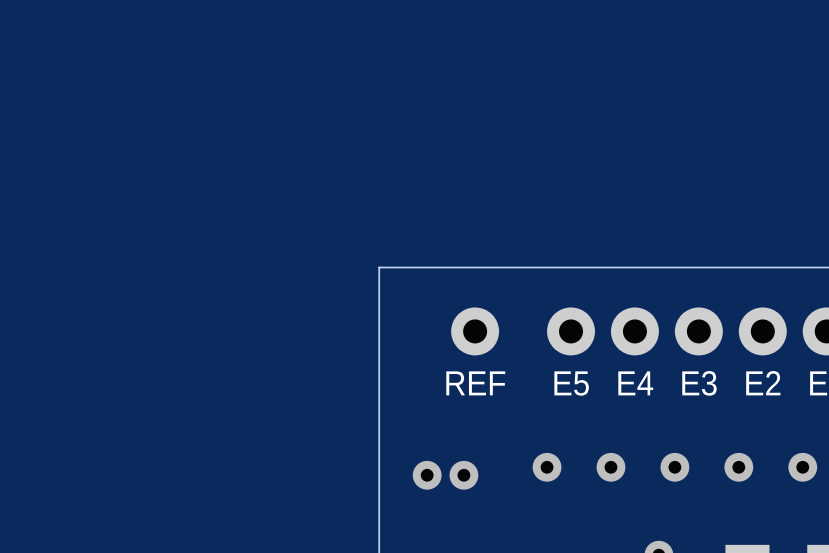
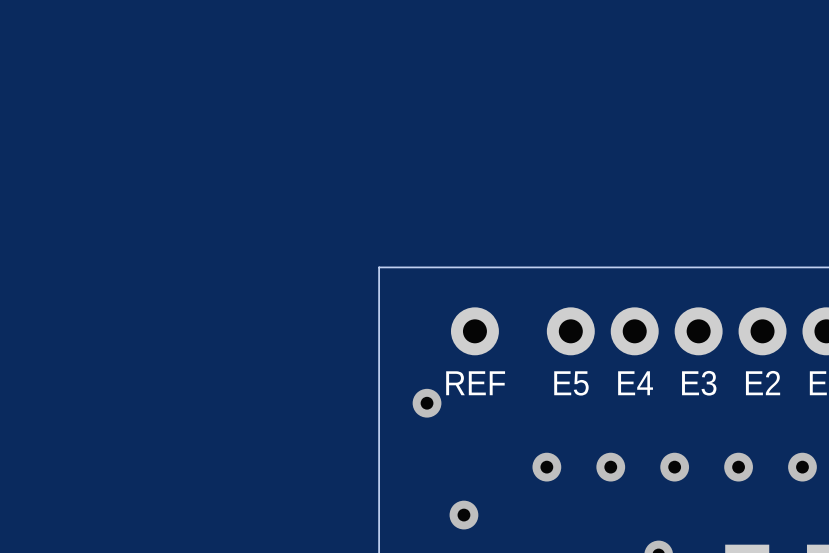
via: none -> (427, 403)
via: (427, 475) -> none
via: (463, 475) -> none
via: none -> (463, 515)

